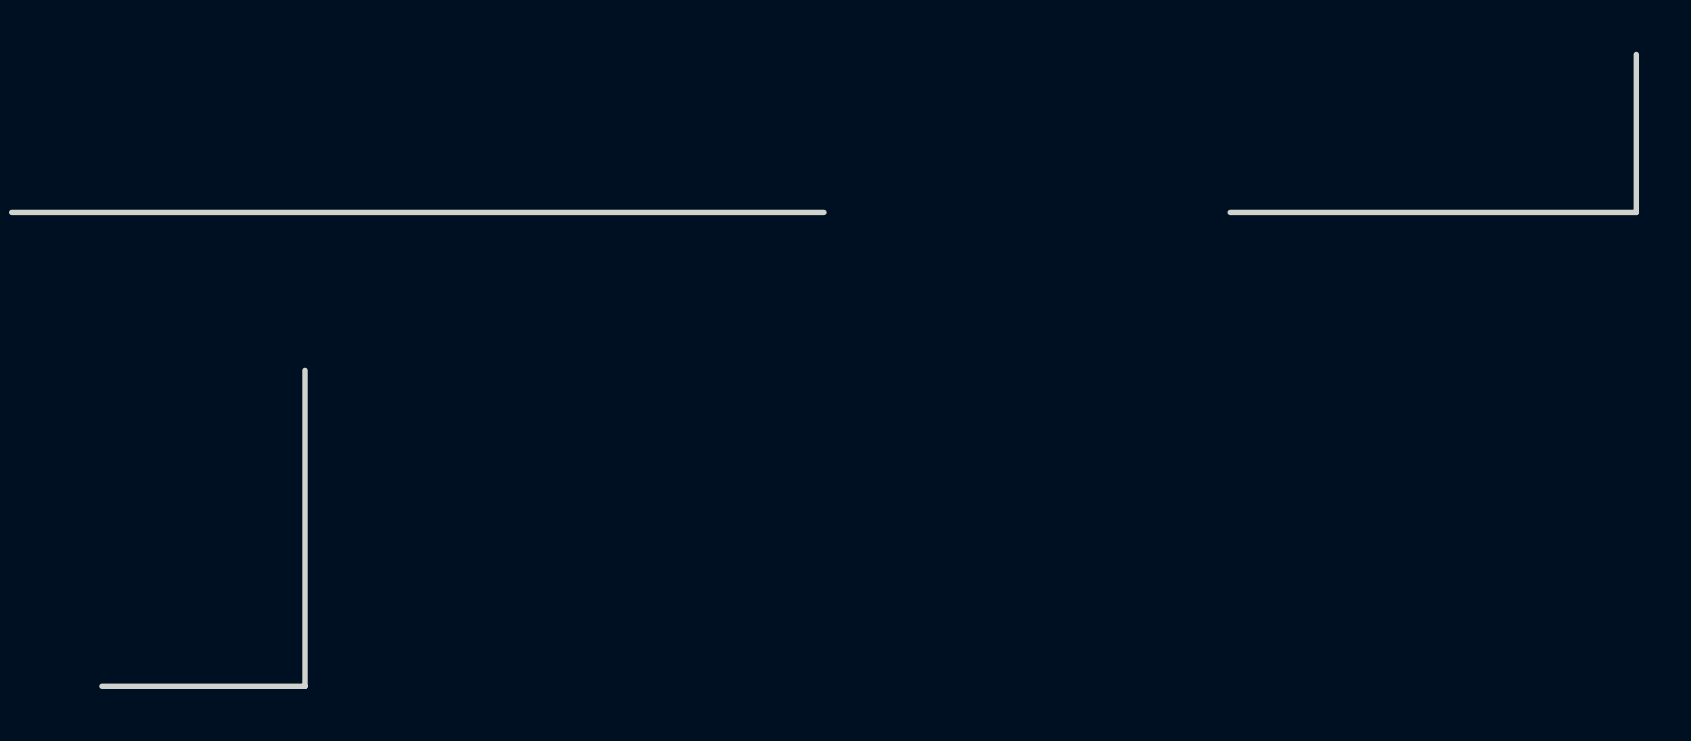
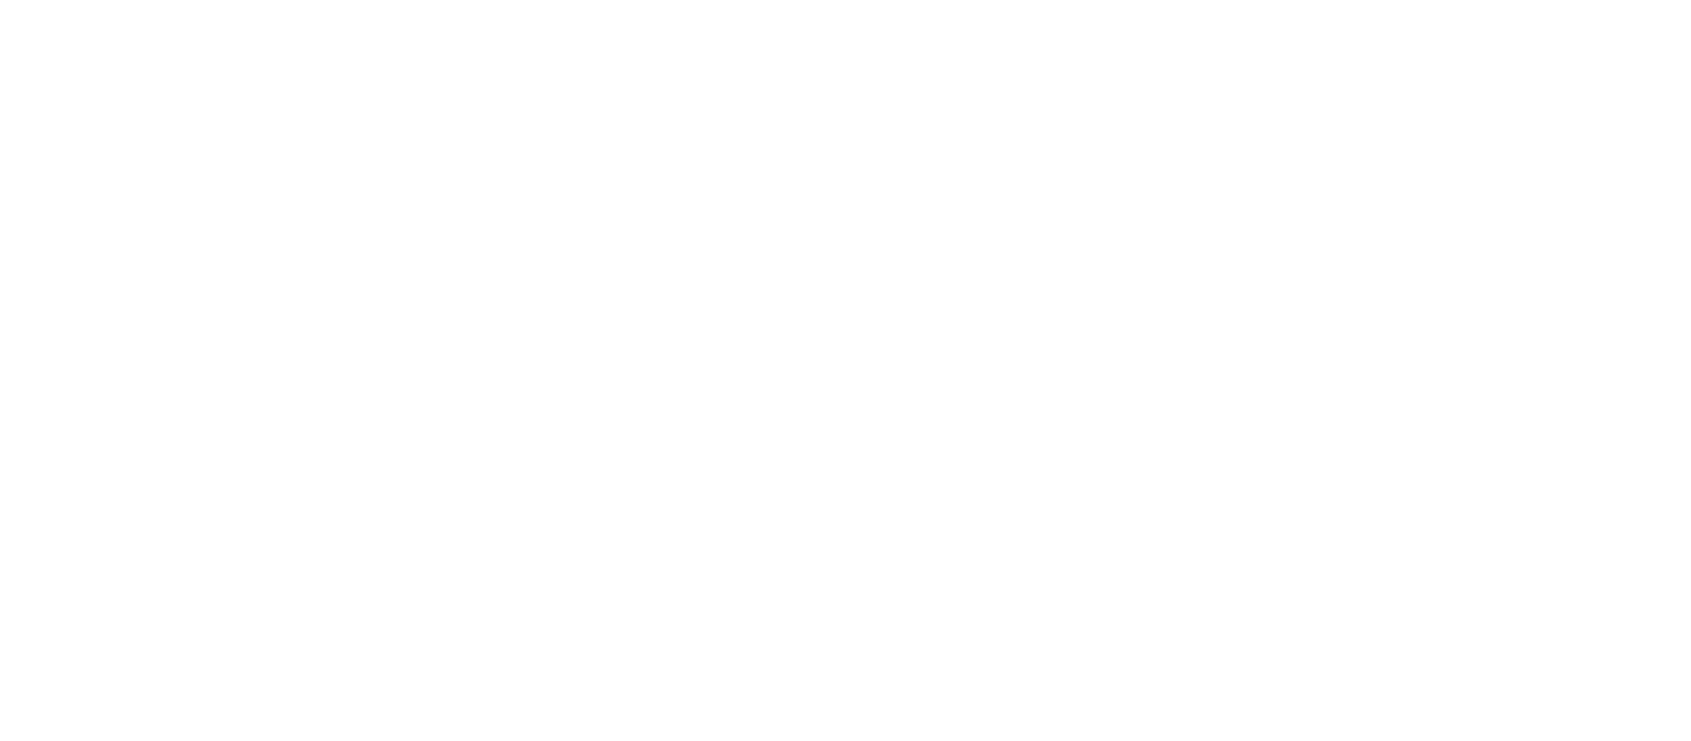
board edge: (1636, 54) (1636, 212) (1230, 212) -> none
board edge: (11, 212) (823, 212) -> none
board edge: (305, 370) (305, 686) (101, 686) -> none

